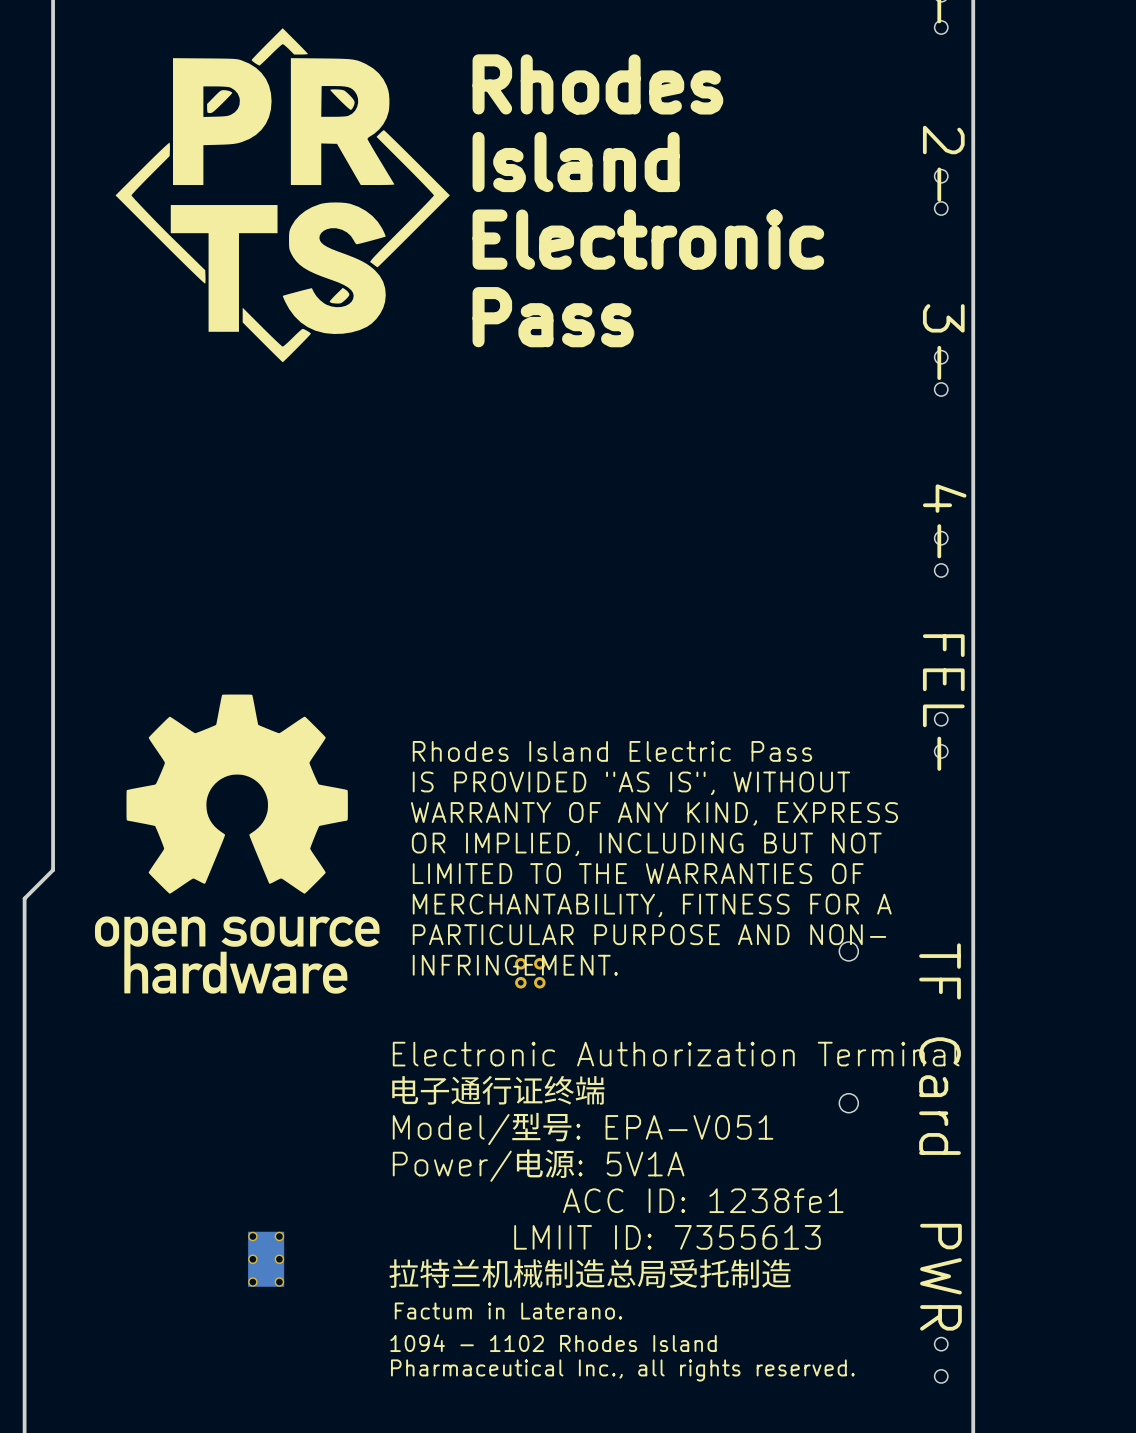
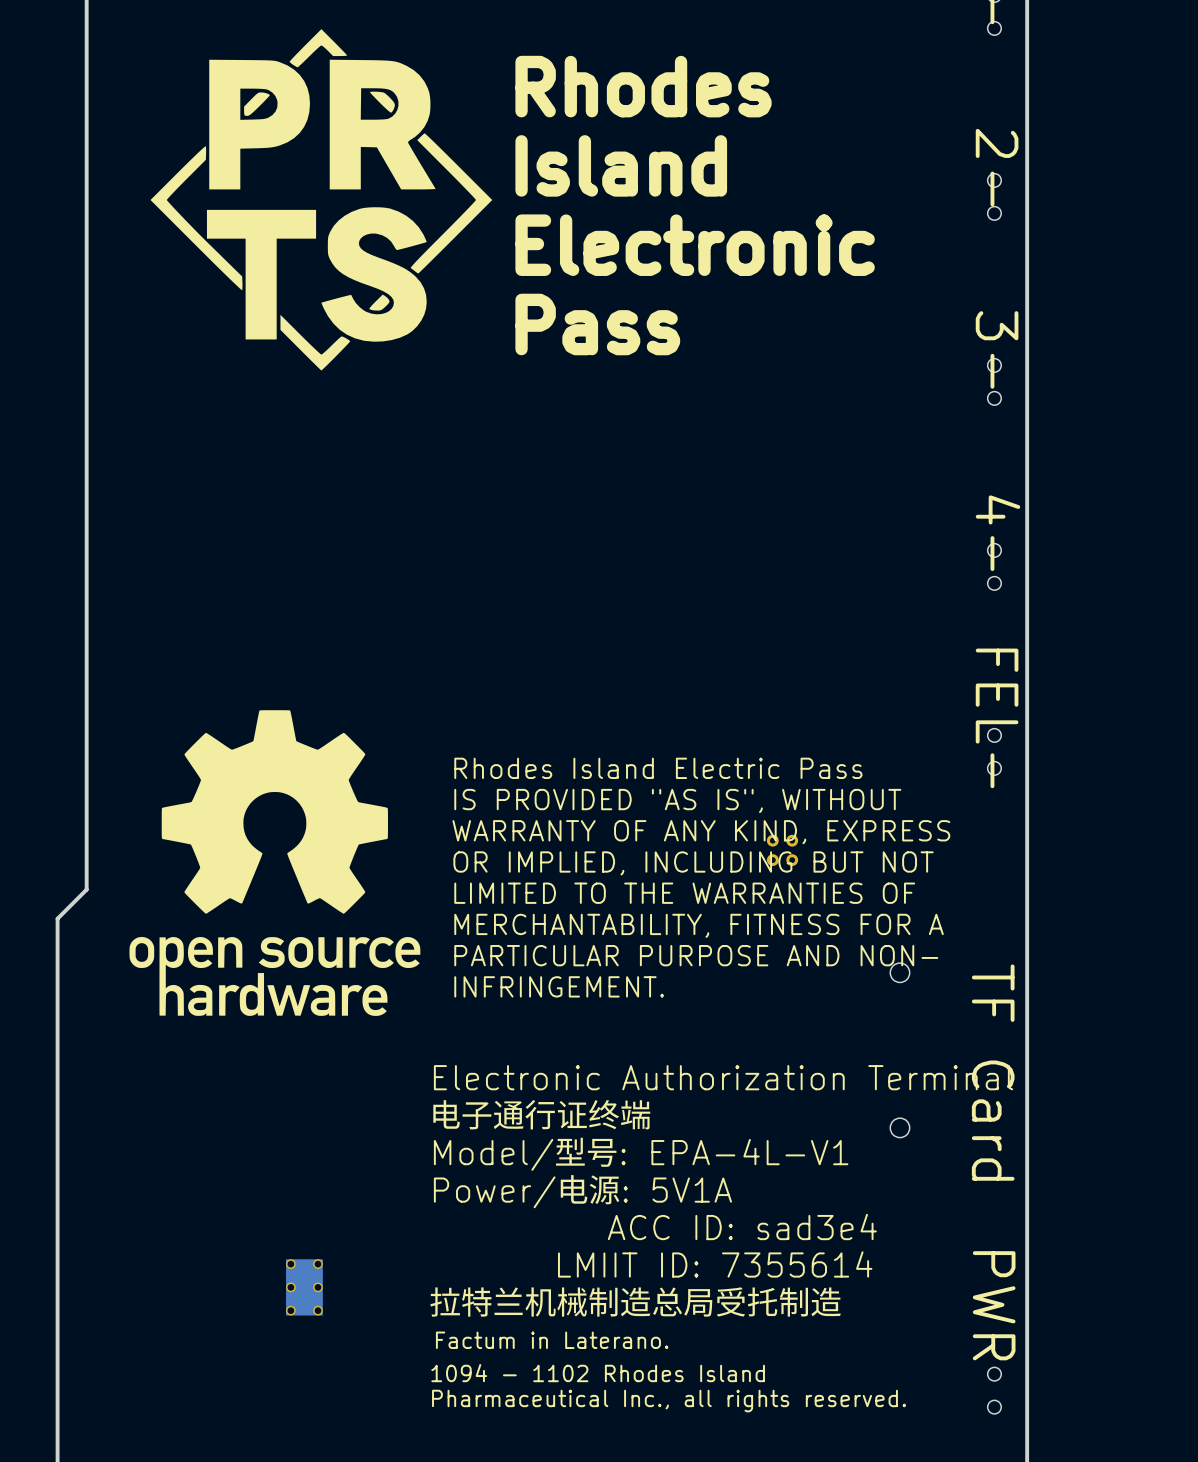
part position: (530, 973) -> (782, 850)
text: Model/型号: EPA-V051 (583, 1128) -> Model/型号: EPA-4L-V1 (641, 1153)
text: ACC ID: 1238fe1 (703, 1200) -> ACC ID: sad3e4 (742, 1226)
text: LMIIT ID: 7355613 (667, 1237) -> LMIIT ID: 7355614 (715, 1264)

